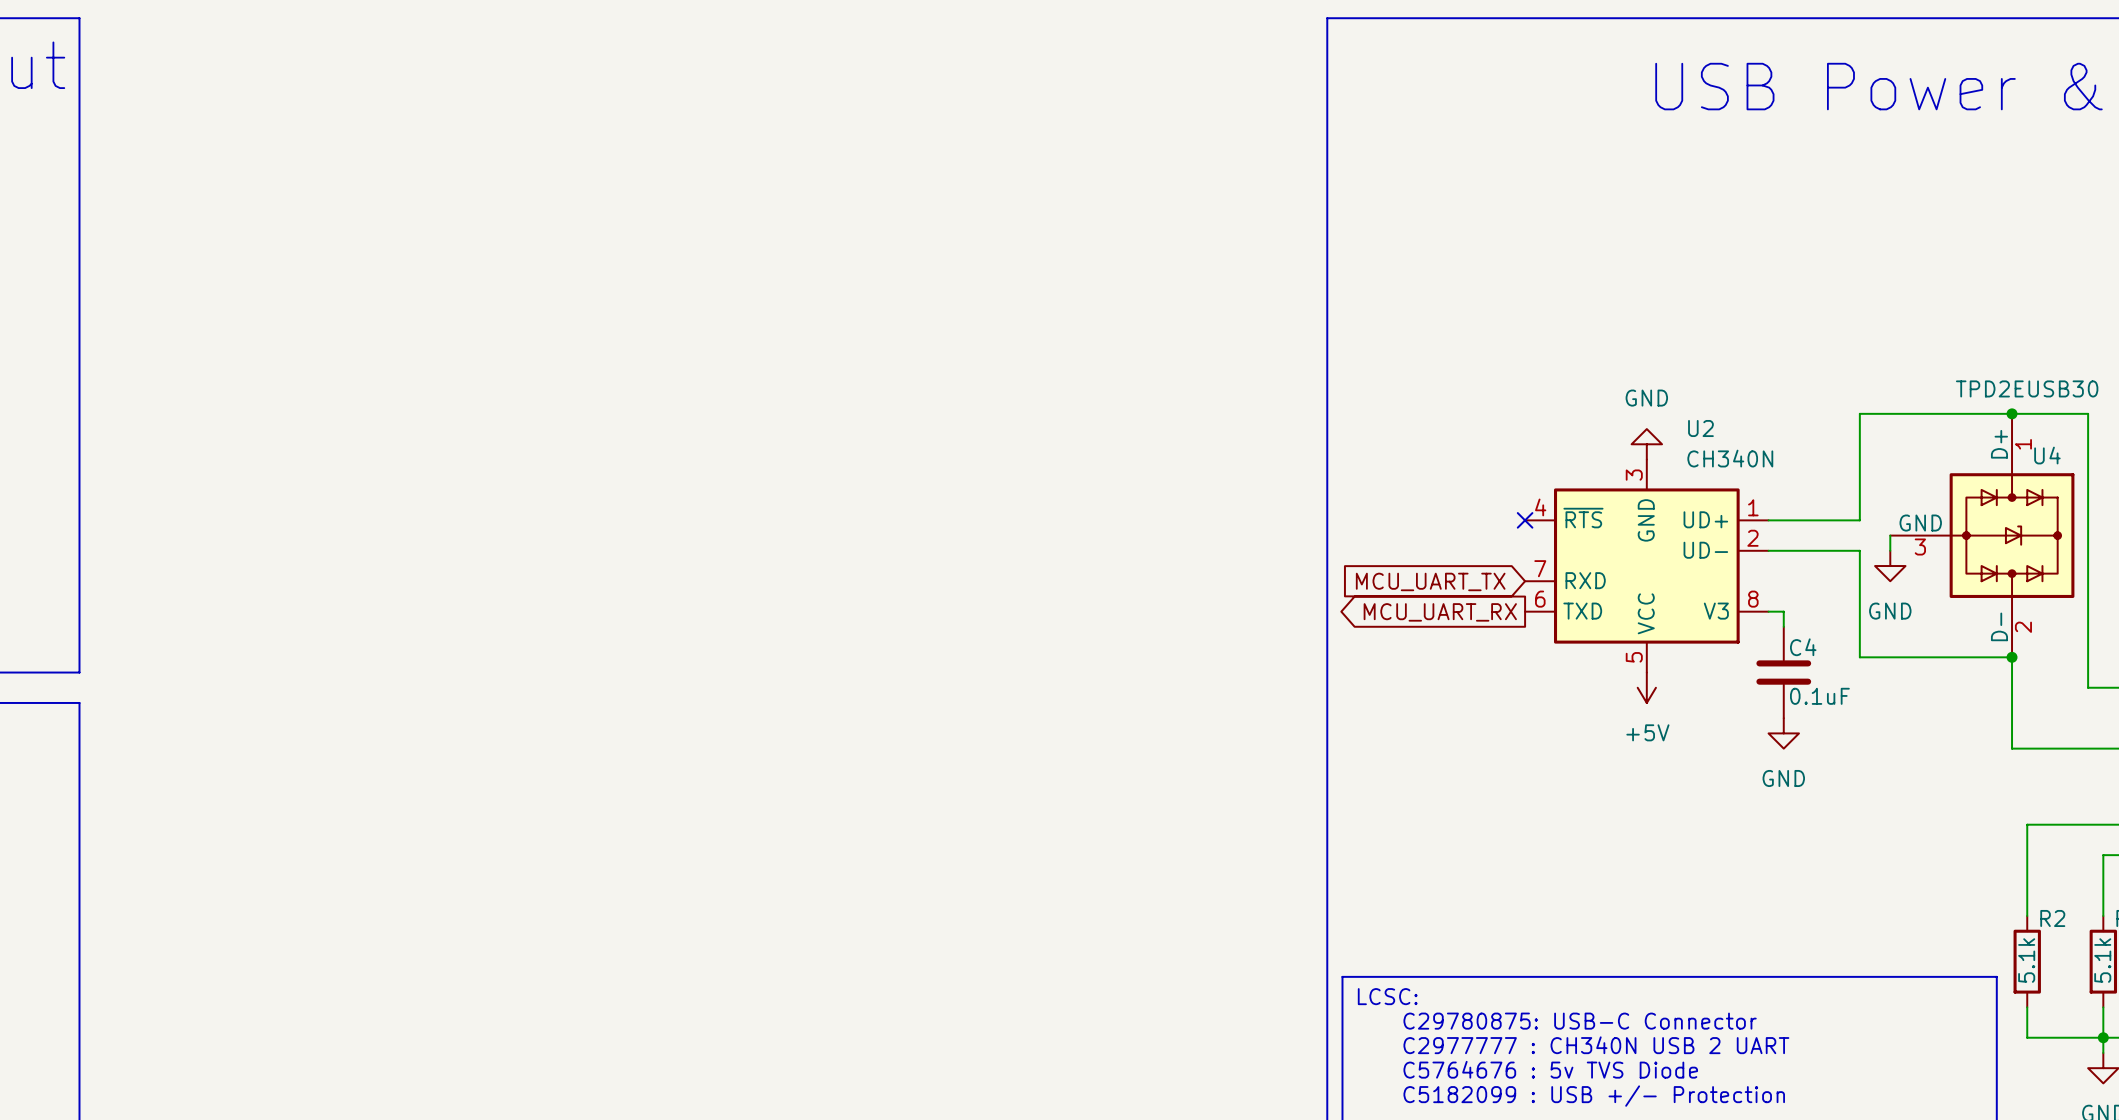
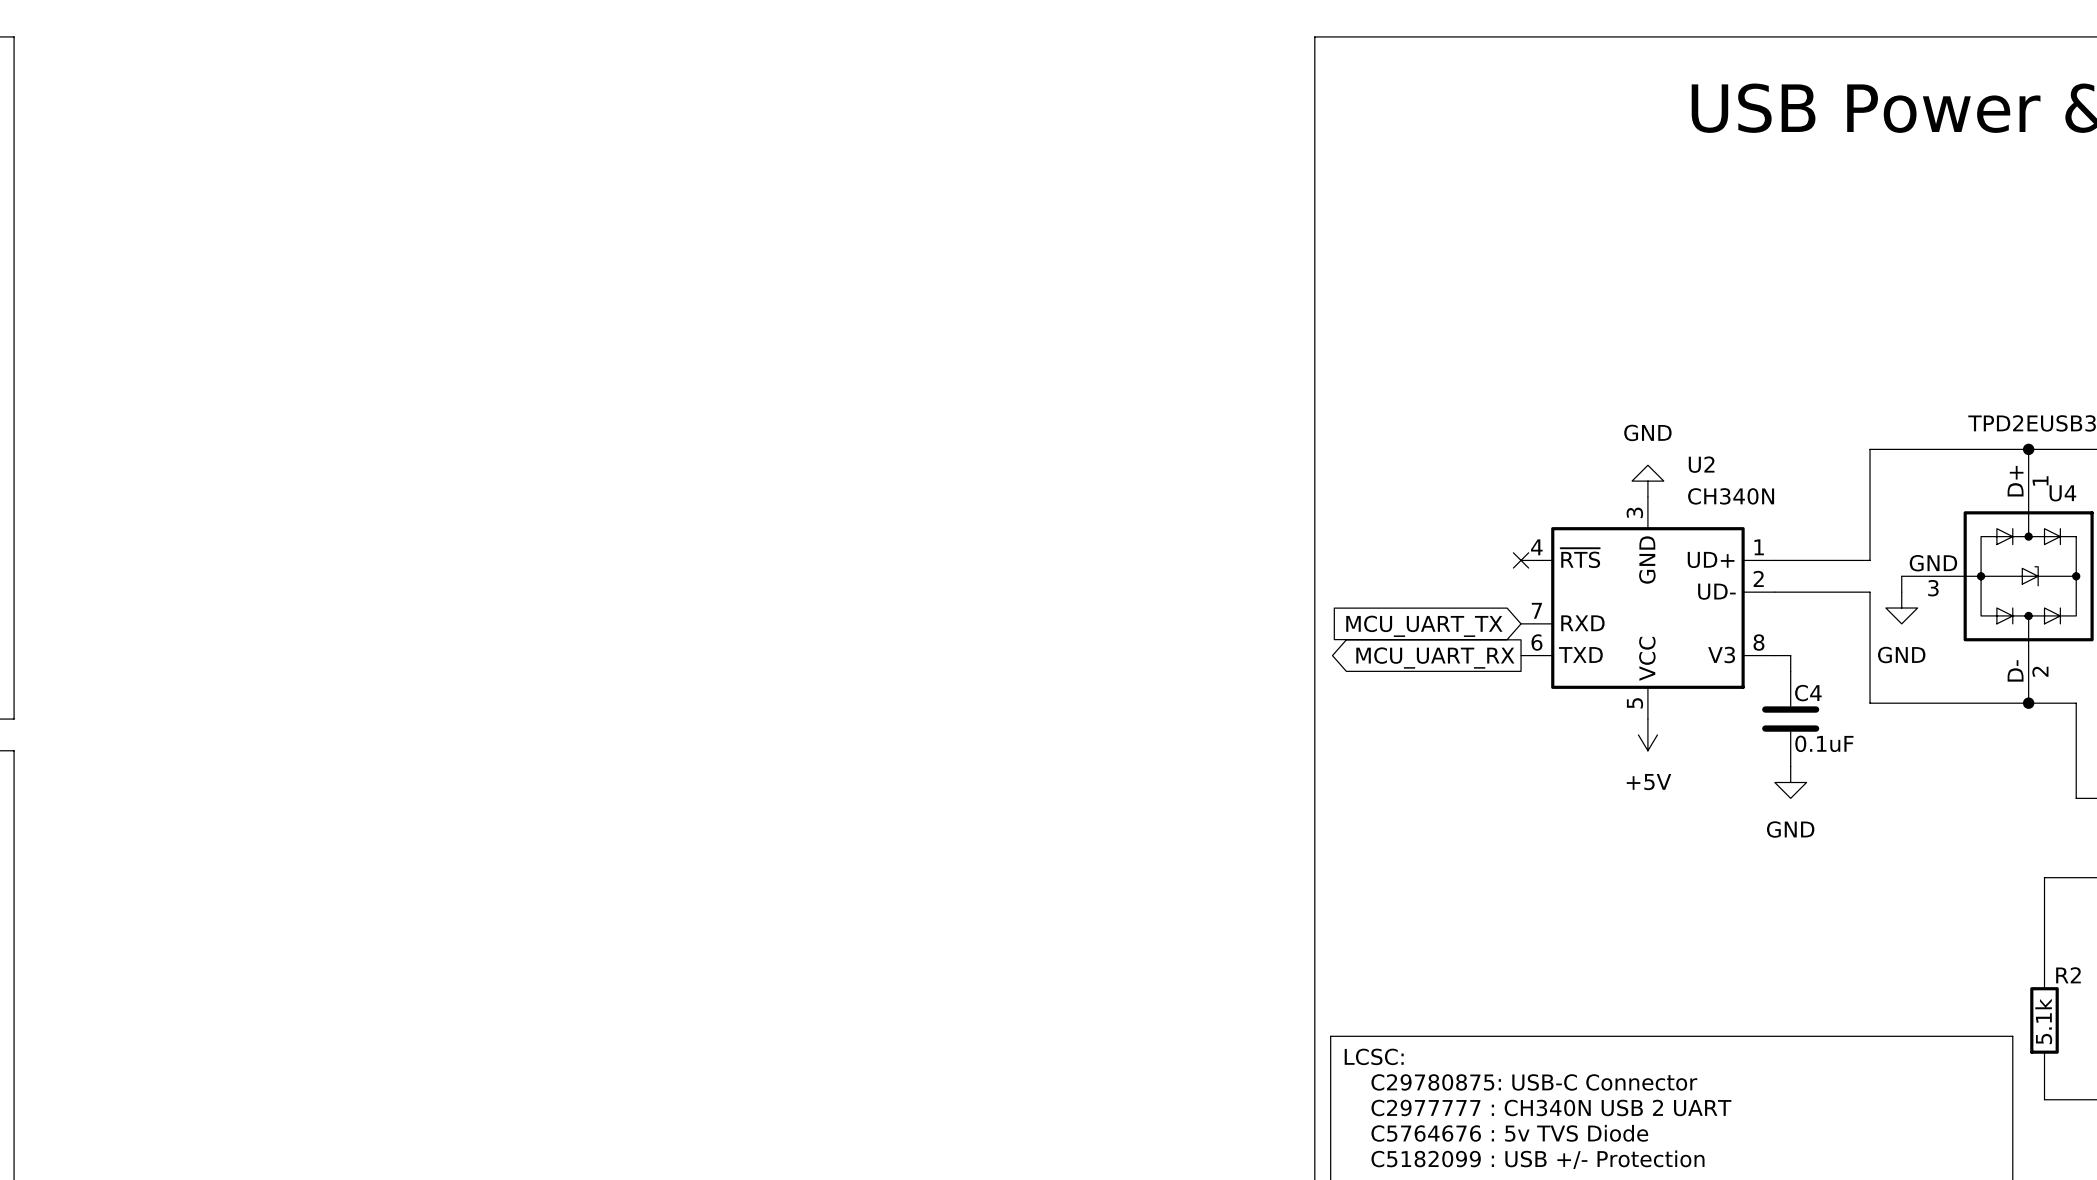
wire: (2012, 657) (2012, 748) (2057, 748) -> (2028, 703) (2076, 703) (2076, 798)

